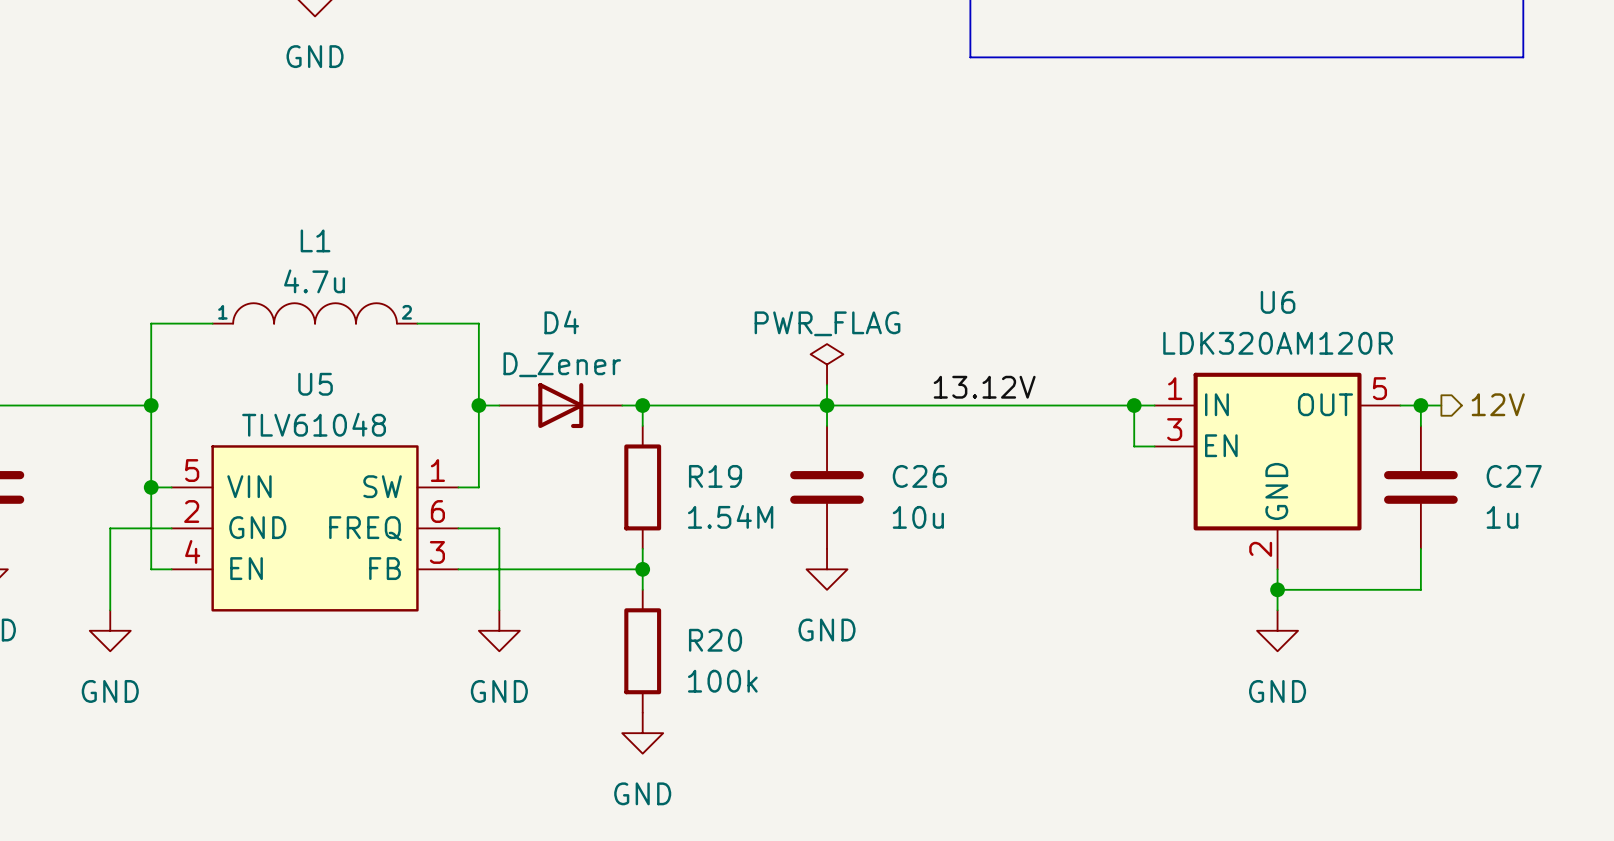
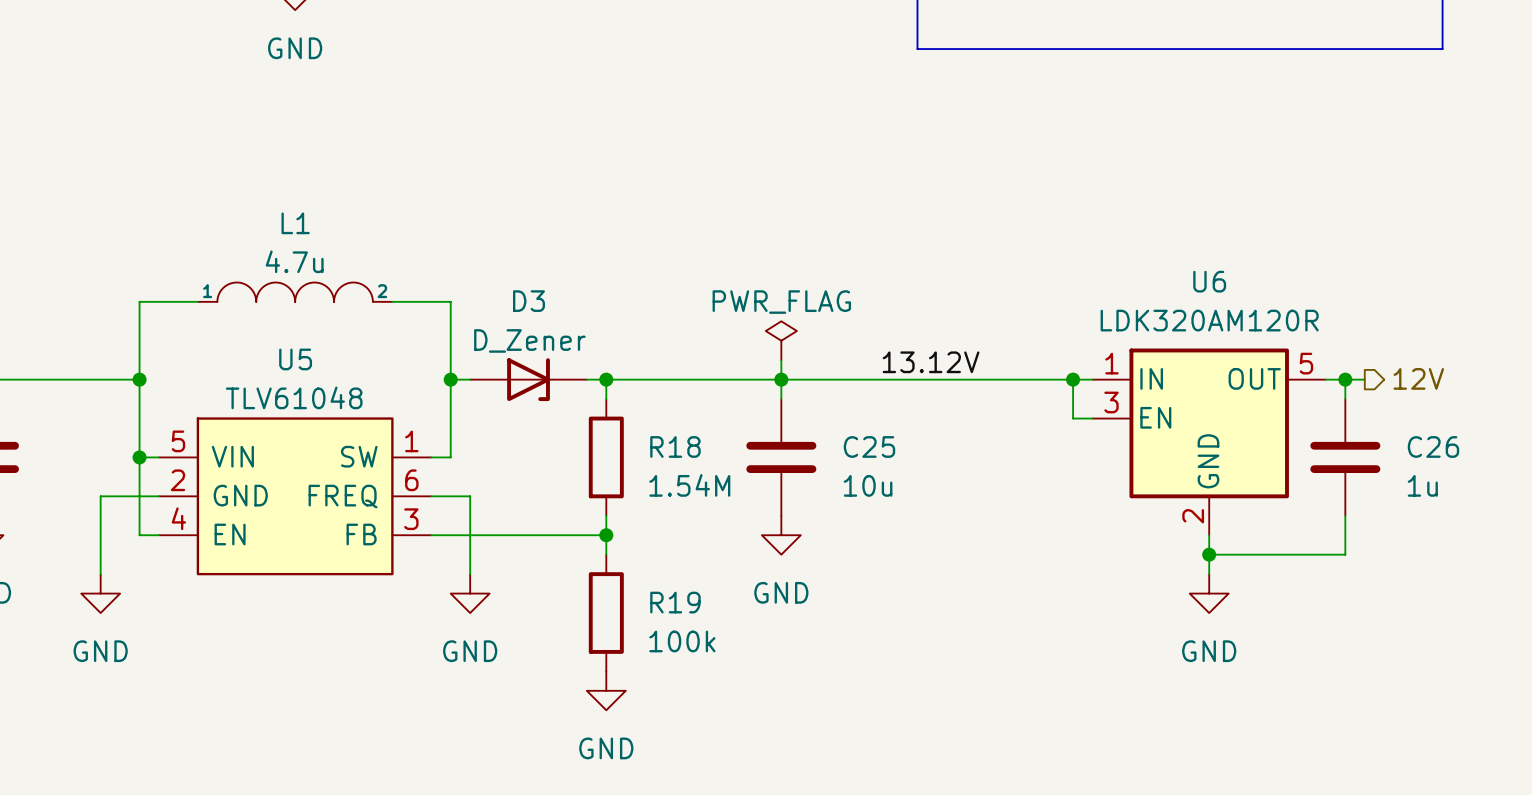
D4 name: D4 (561, 322) -> D3 (528, 301)
R19 name: R19 (715, 476) -> R18 (675, 446)
C26 name: C26 (919, 476) -> C25 (869, 446)
C27 name: C27 (1514, 476) -> C26 (1433, 446)
R20 name: R20 (715, 640) -> R19 (675, 602)

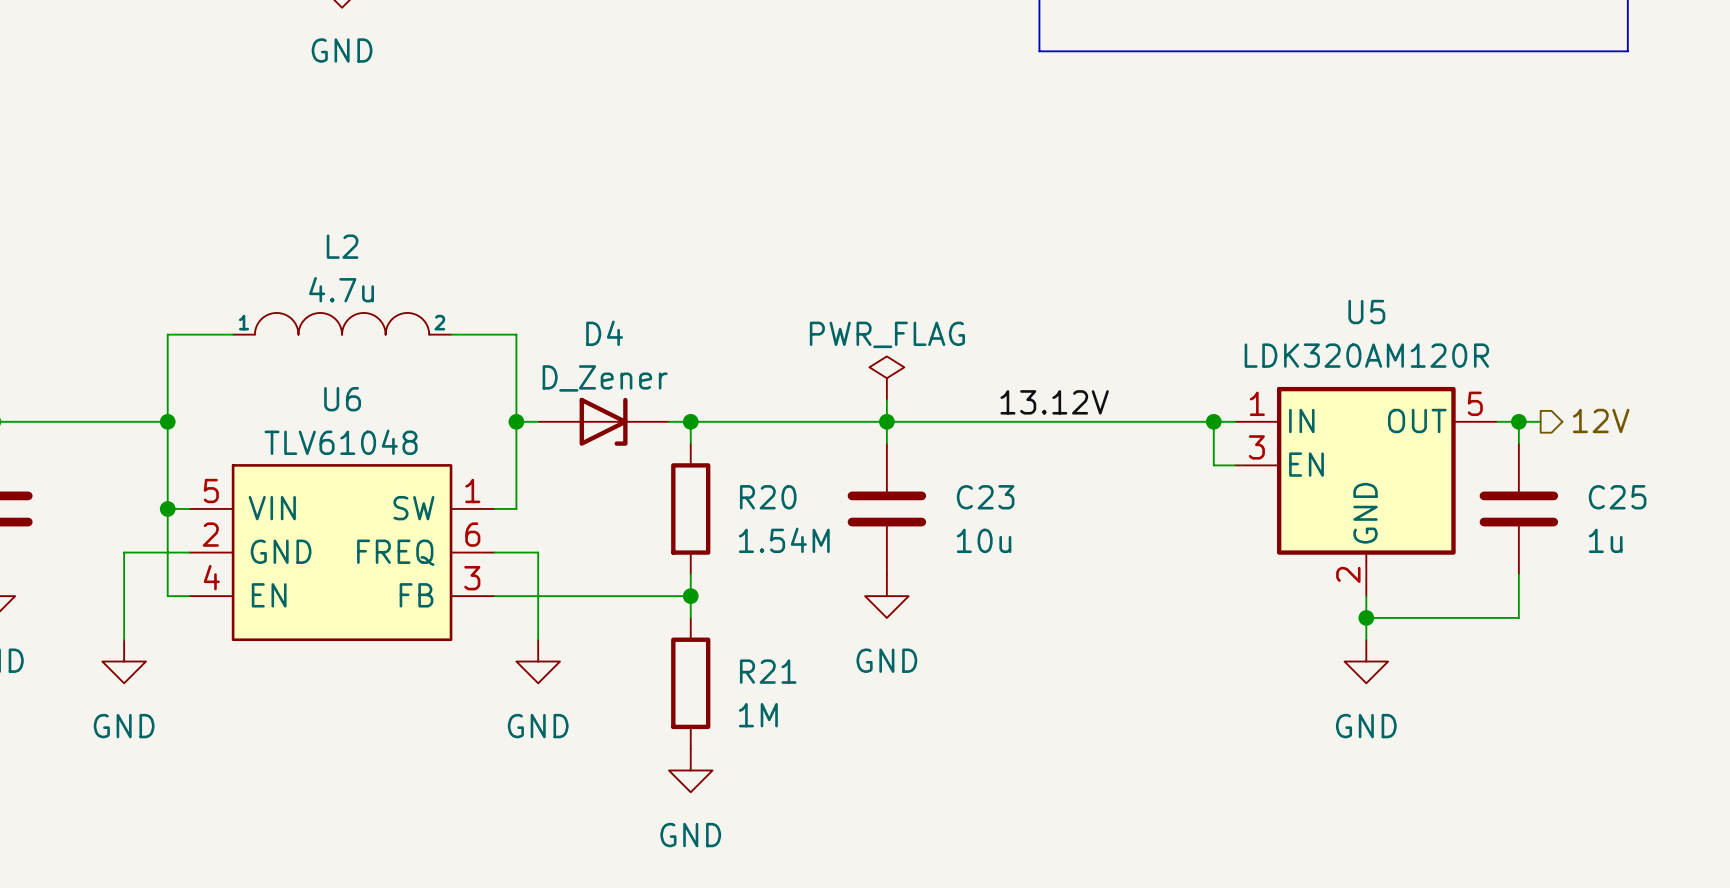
L1 name: L1 (295, 223) -> L2 (342, 246)
U6 name: U6 (1209, 281) -> U5 (1366, 312)
D3 name: D3 (528, 301) -> D4 (604, 333)
U5 name: U5 (295, 359) -> U6 (342, 399)
R18 name: R18 (675, 446) -> R20 (768, 497)
C25 name: C25 (869, 446) -> C23 (985, 497)
C26 name: C26 (1433, 446) -> C25 (1617, 497)
R19 name: R19 (675, 602) -> R21 (768, 671)
R19 value: 100k (682, 641) -> 1M (758, 715)

